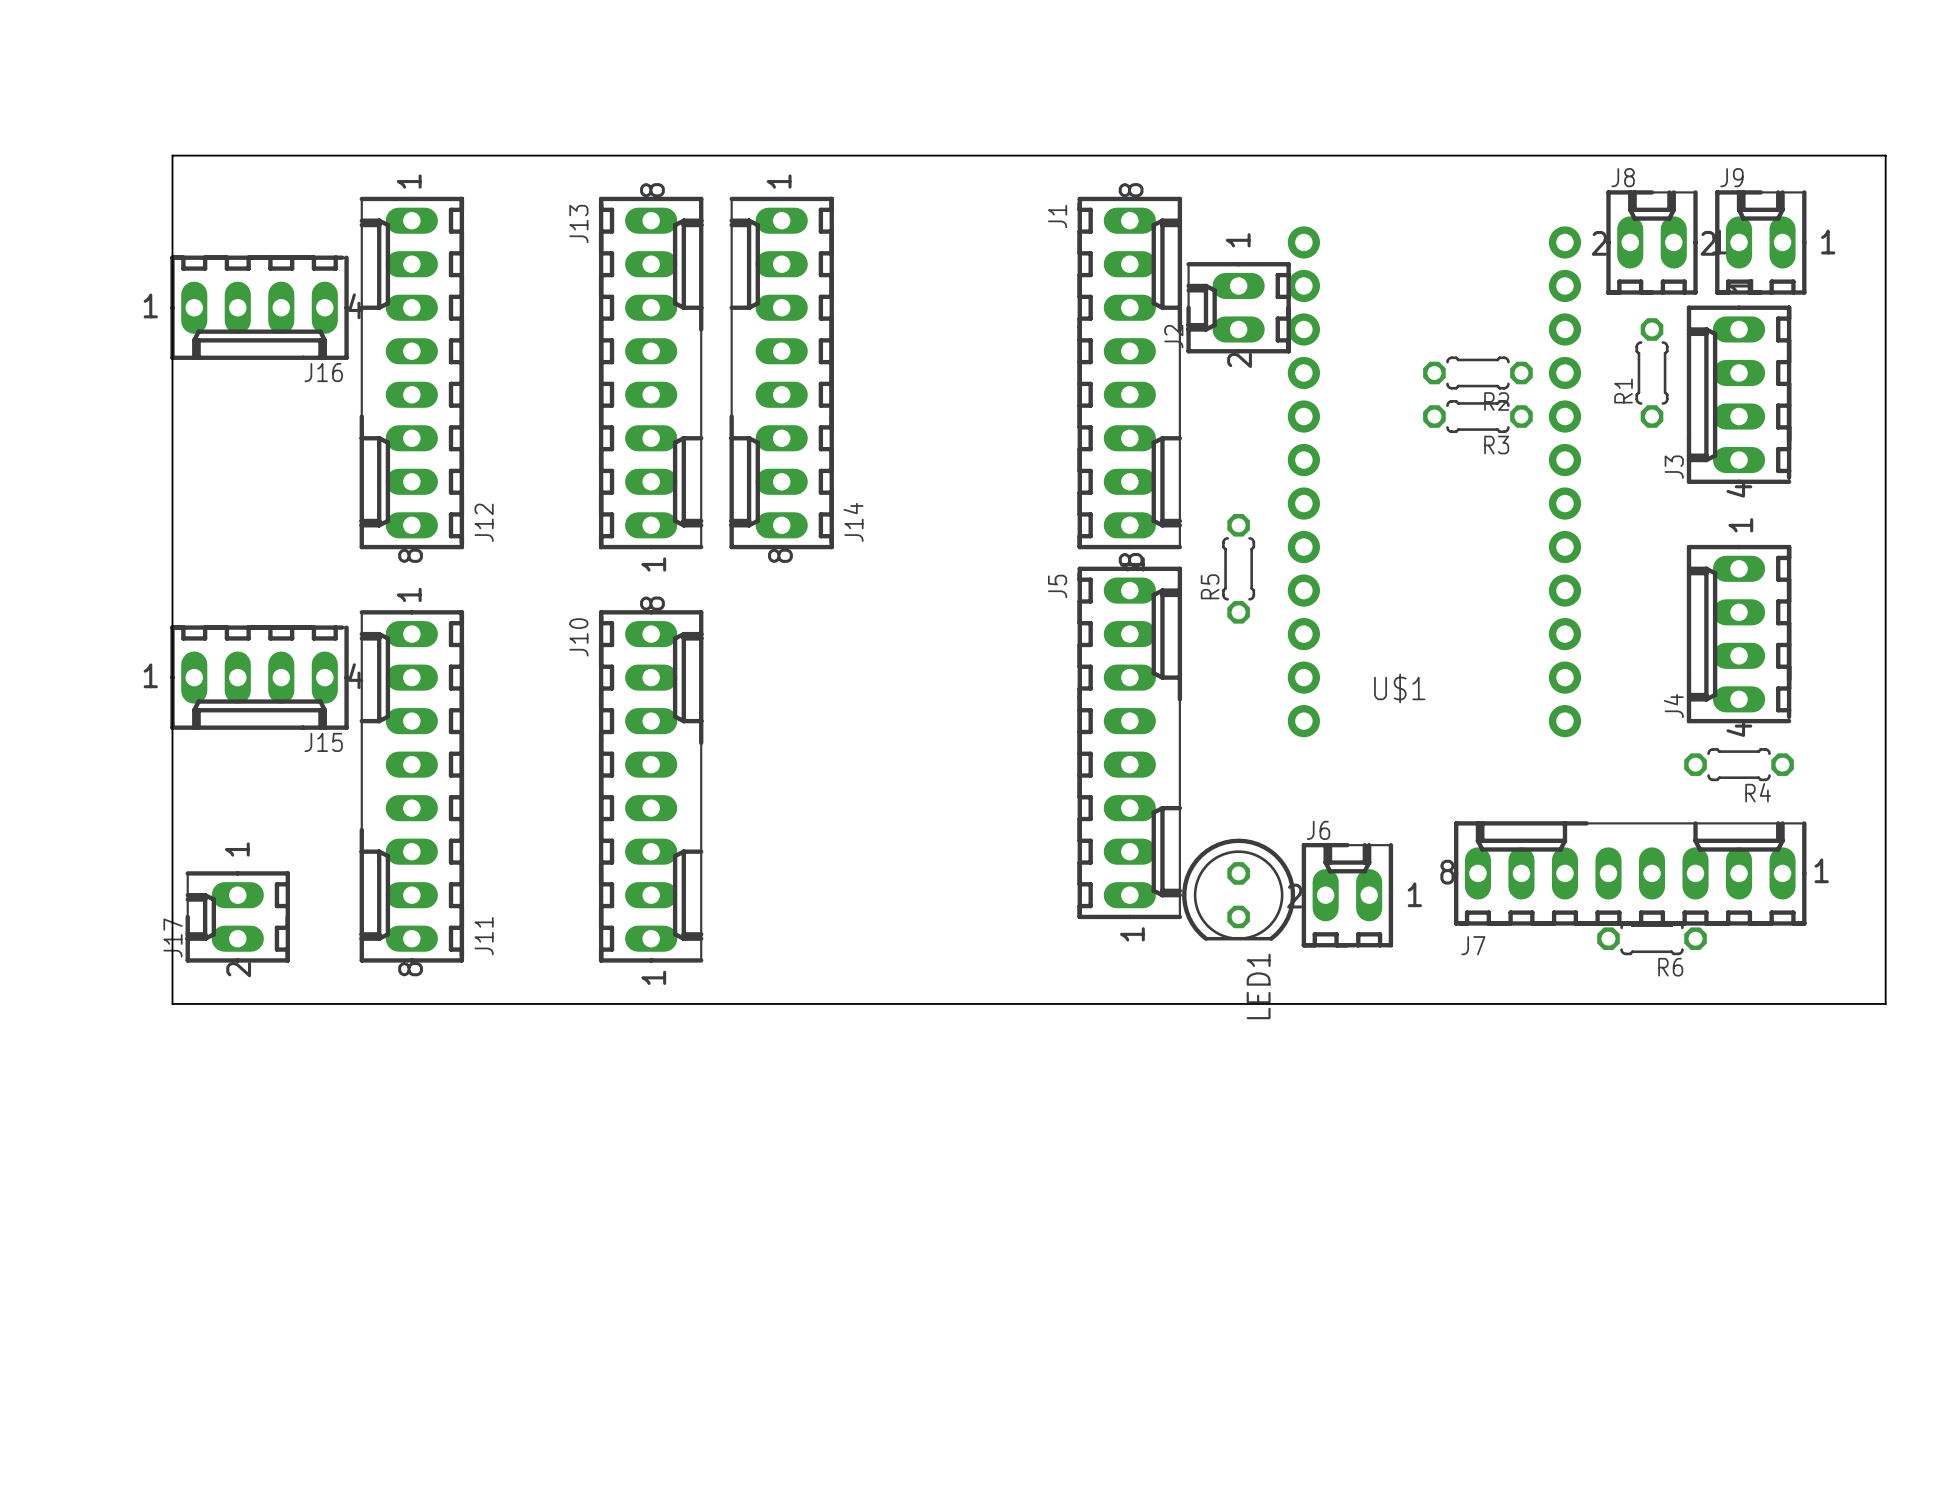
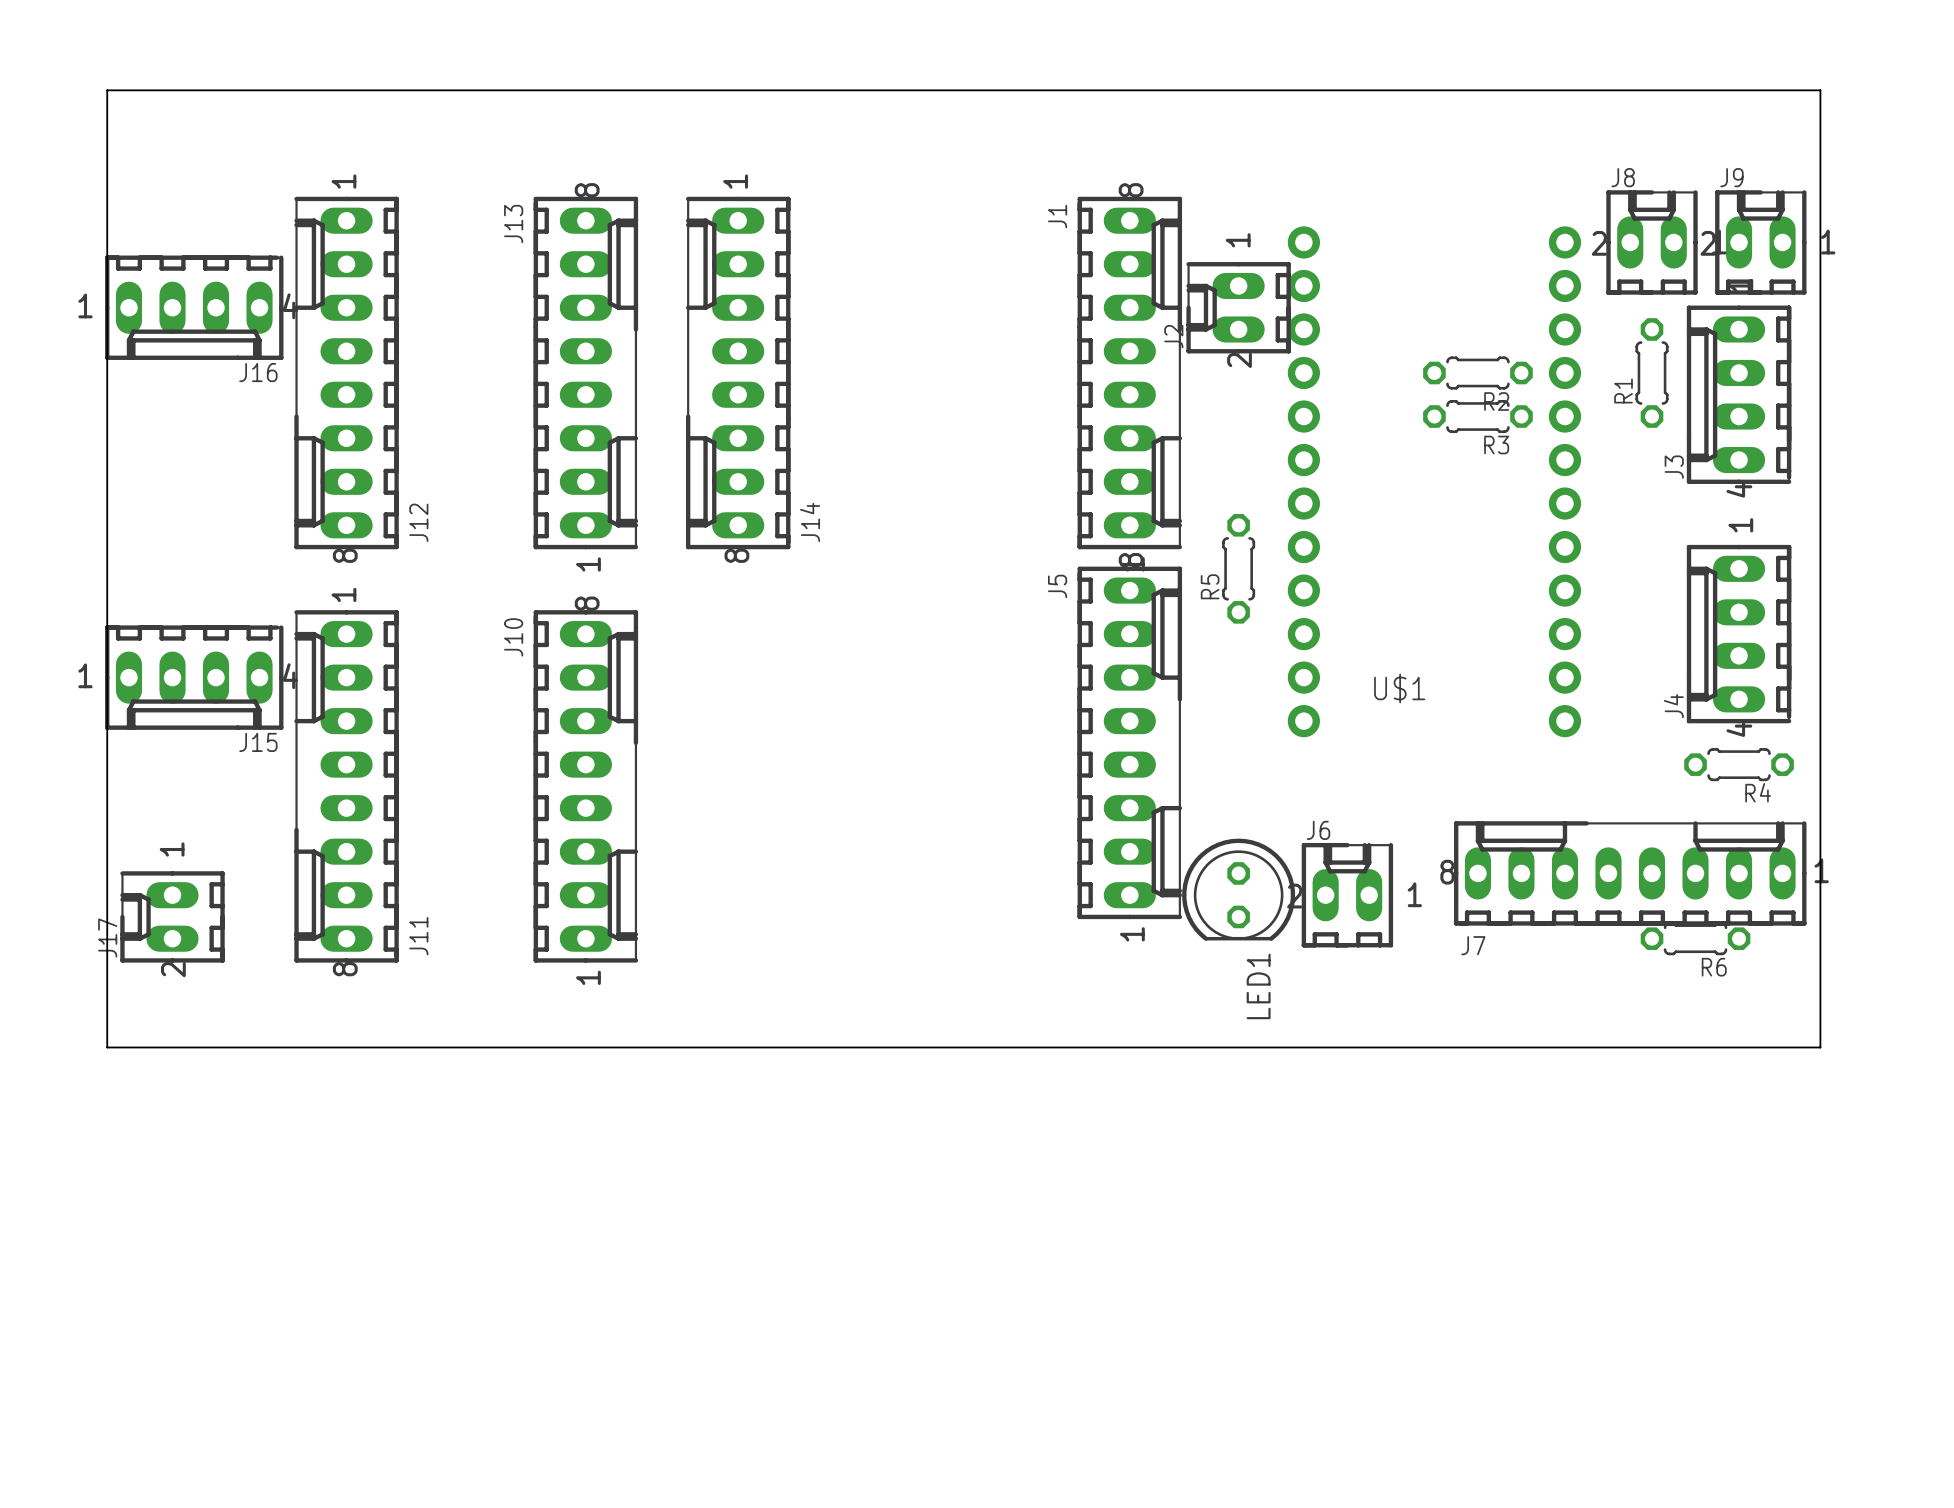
board edge: (172, 155) (1885, 155) (1885, 1003) (172, 1003) (172, 155) -> (107, 90) (107, 1047) (1820, 1047) (1820, 90) (107, 90)
J16 position: (259, 307) -> (194, 307)
J12 position: (411, 373) -> (346, 373)
J13 position: (651, 373) -> (585, 373)
J14 position: (781, 373) -> (738, 373)
J15 position: (259, 677) -> (194, 677)
J11 position: (411, 786) -> (346, 786)
J10 position: (651, 786) -> (585, 786)
J17 position: (237, 916) -> (172, 916)
R6 position: (1652, 938) -> (1695, 938)

